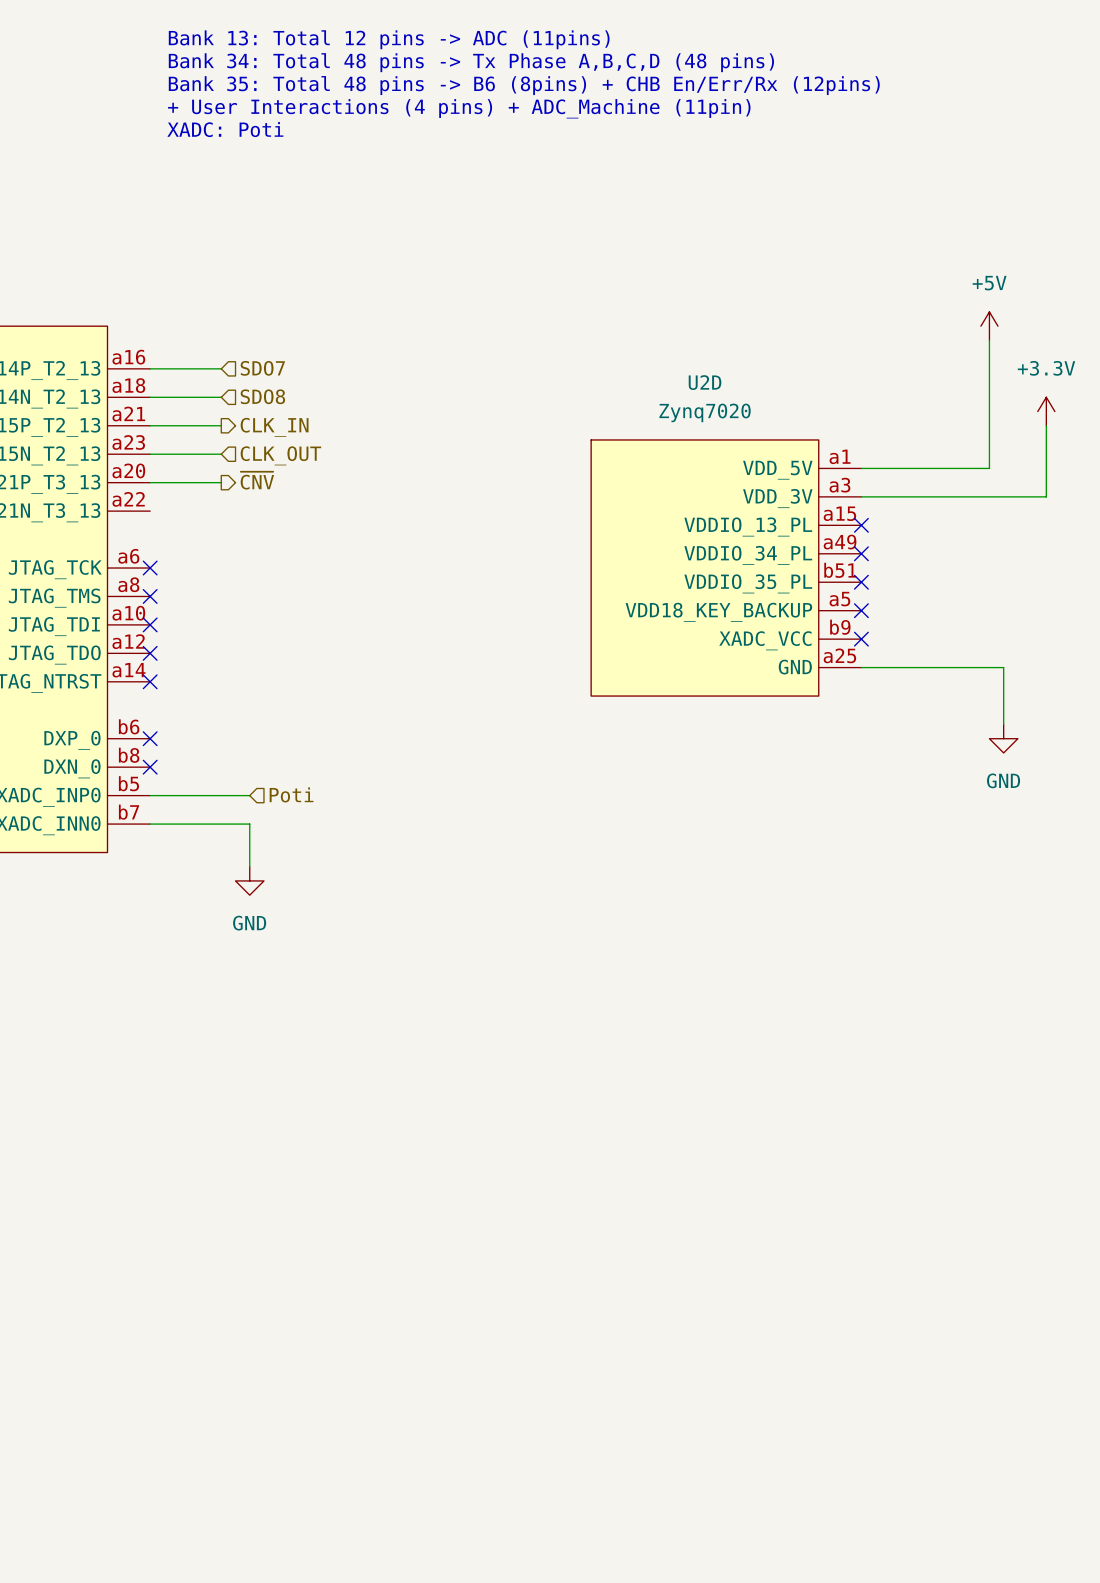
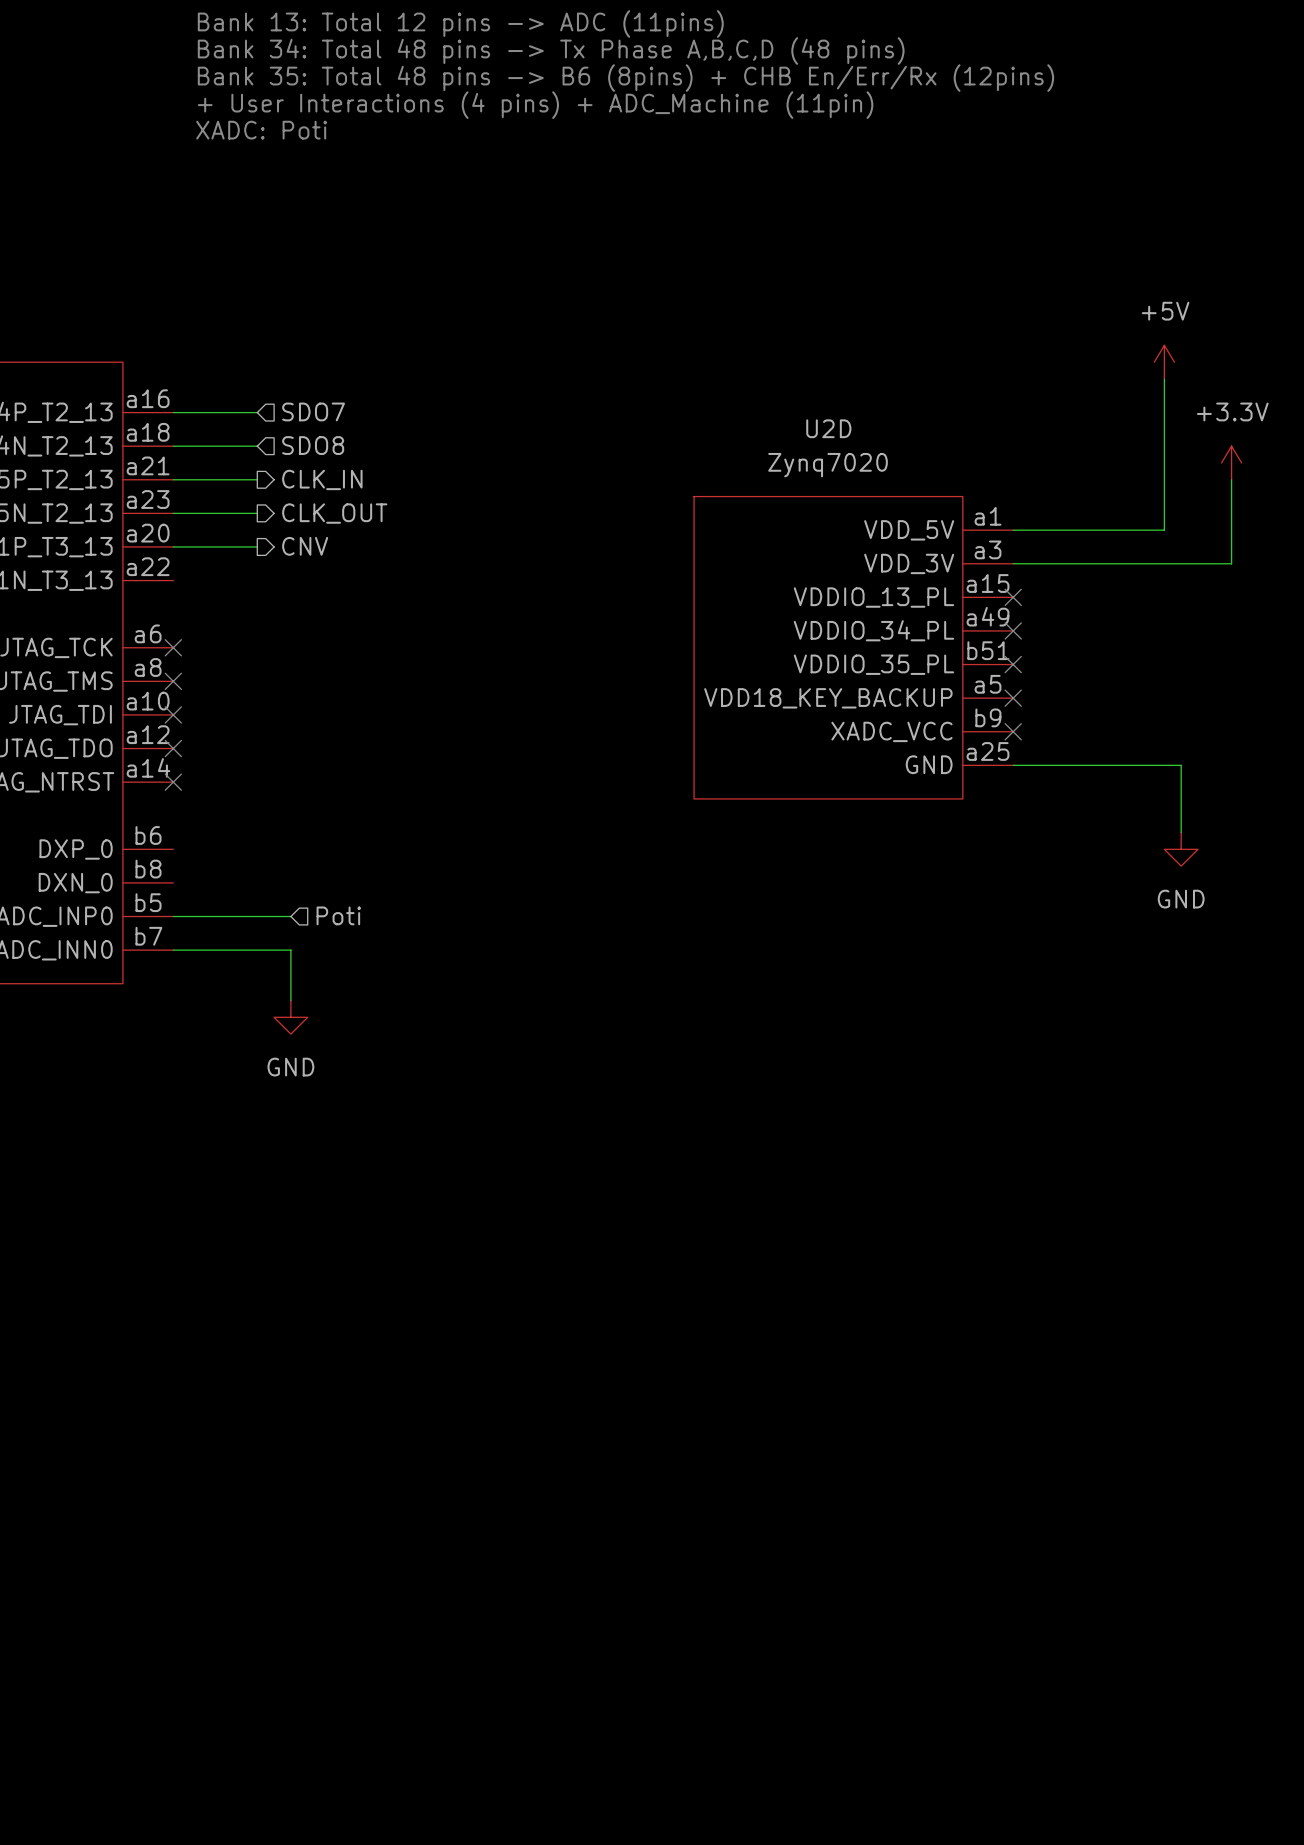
hierarchical label shape: input (280, 455) -> output (334, 513)
hierarchical label: ~{CNV} (257, 480) -> CNV (305, 546)
no-connect mark: (150, 738) -> none
no-connect mark: (150, 767) -> none

